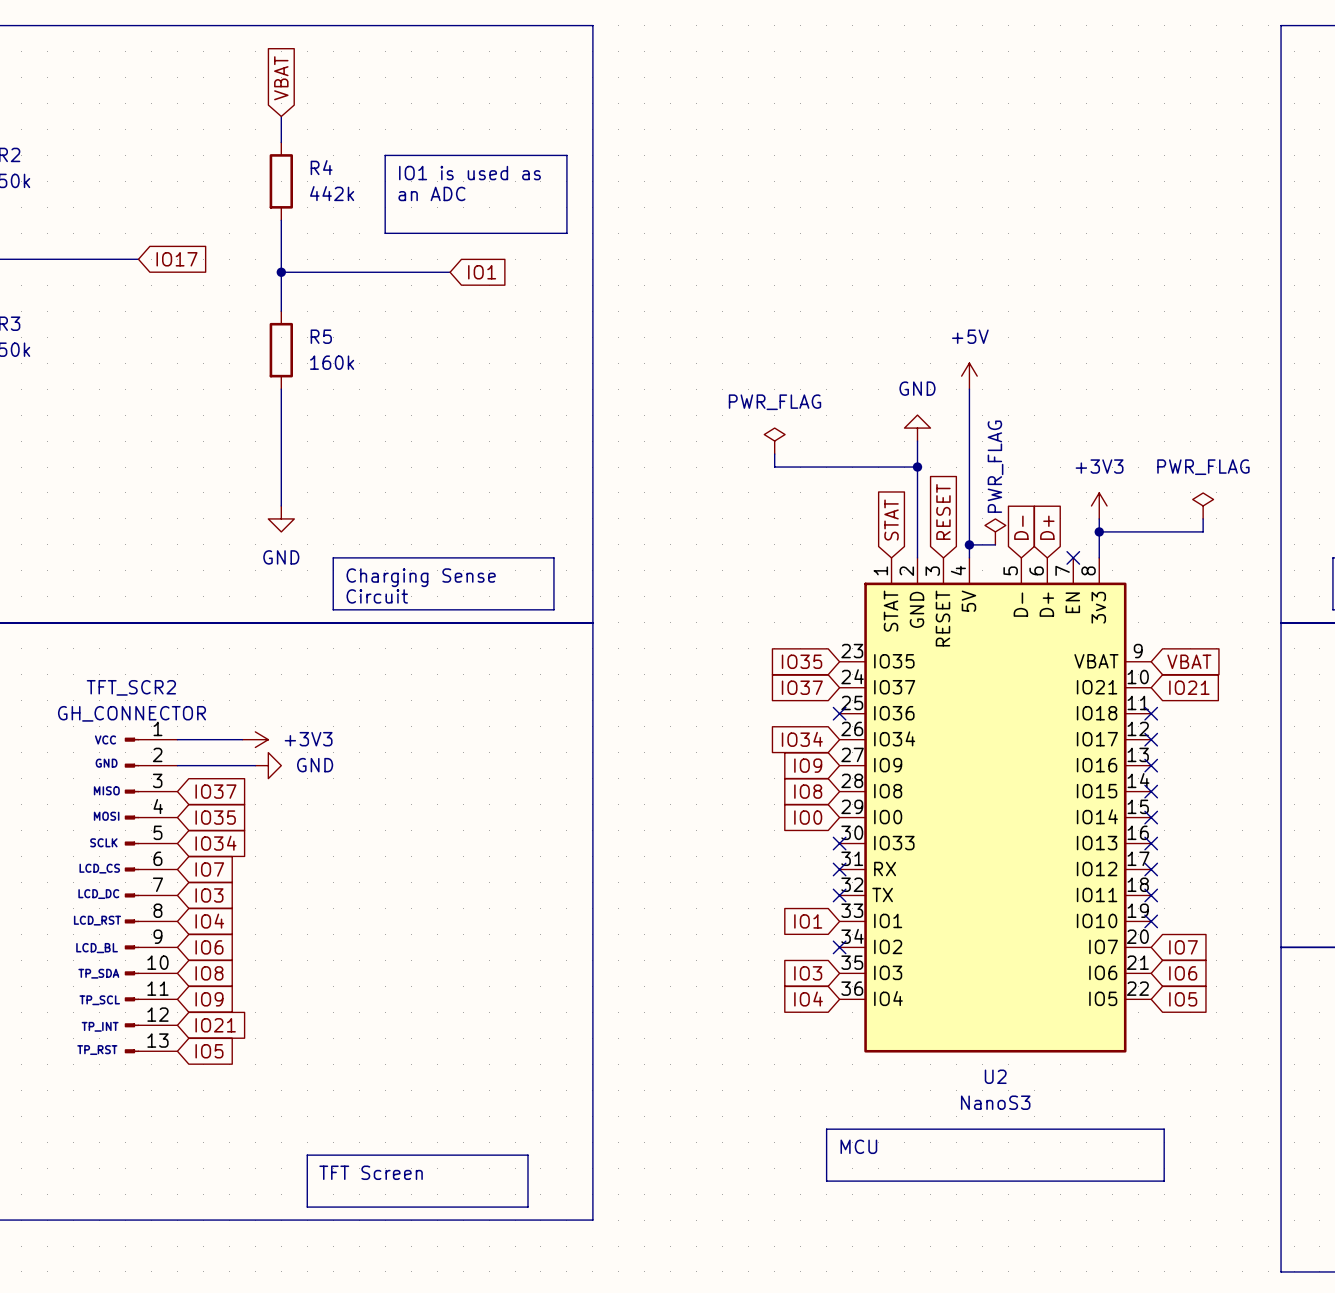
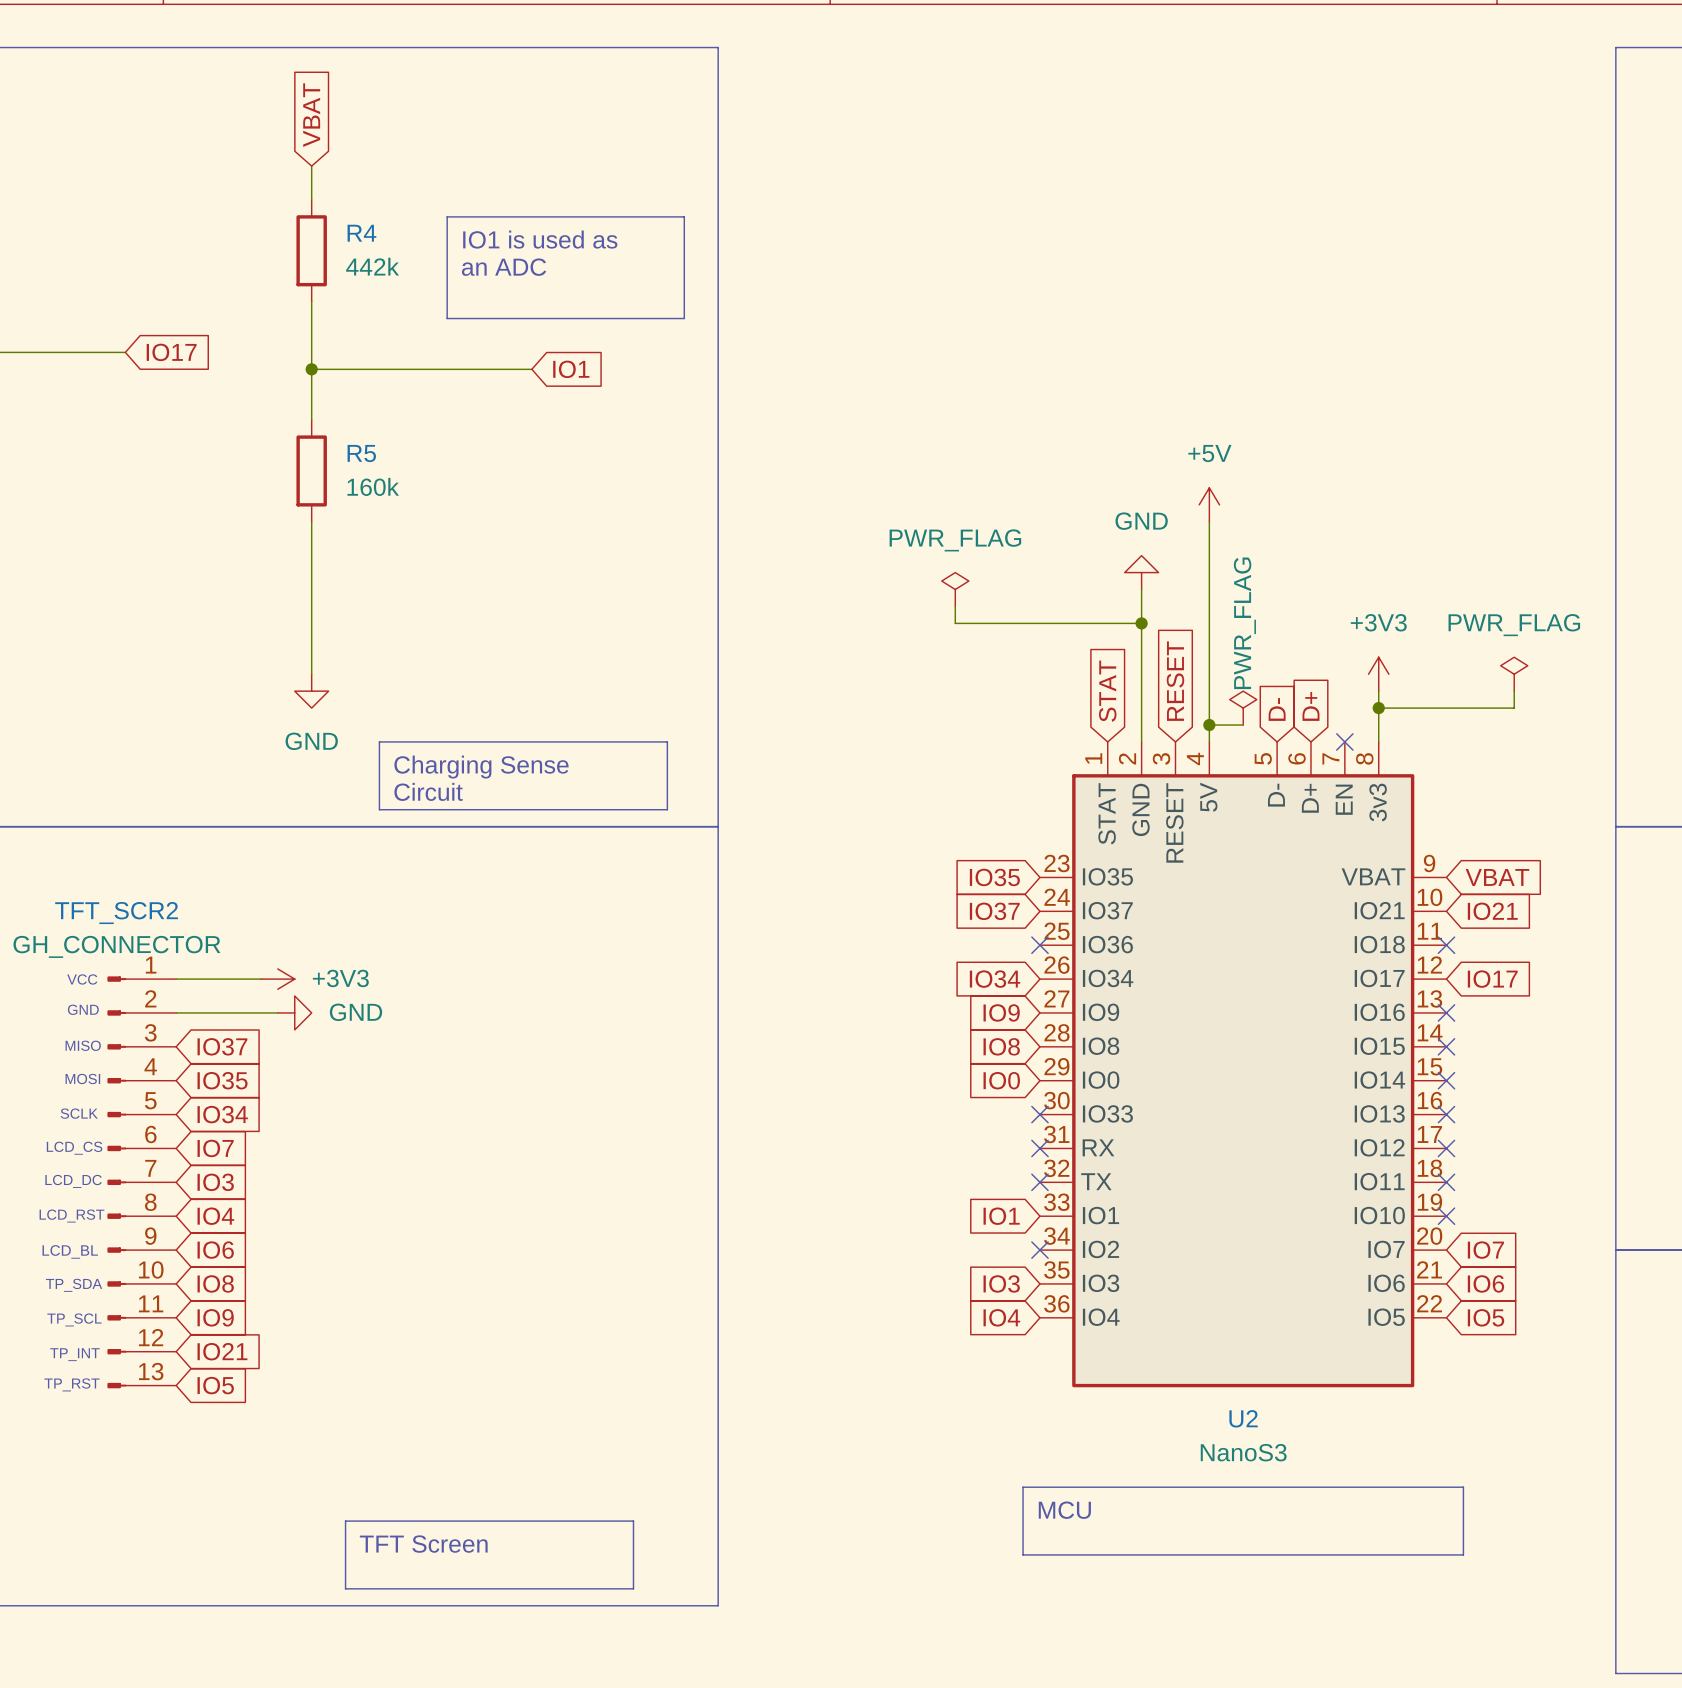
no-connect mark: (1151, 739) -> none
global label: none -> IO17 (1492, 979)

